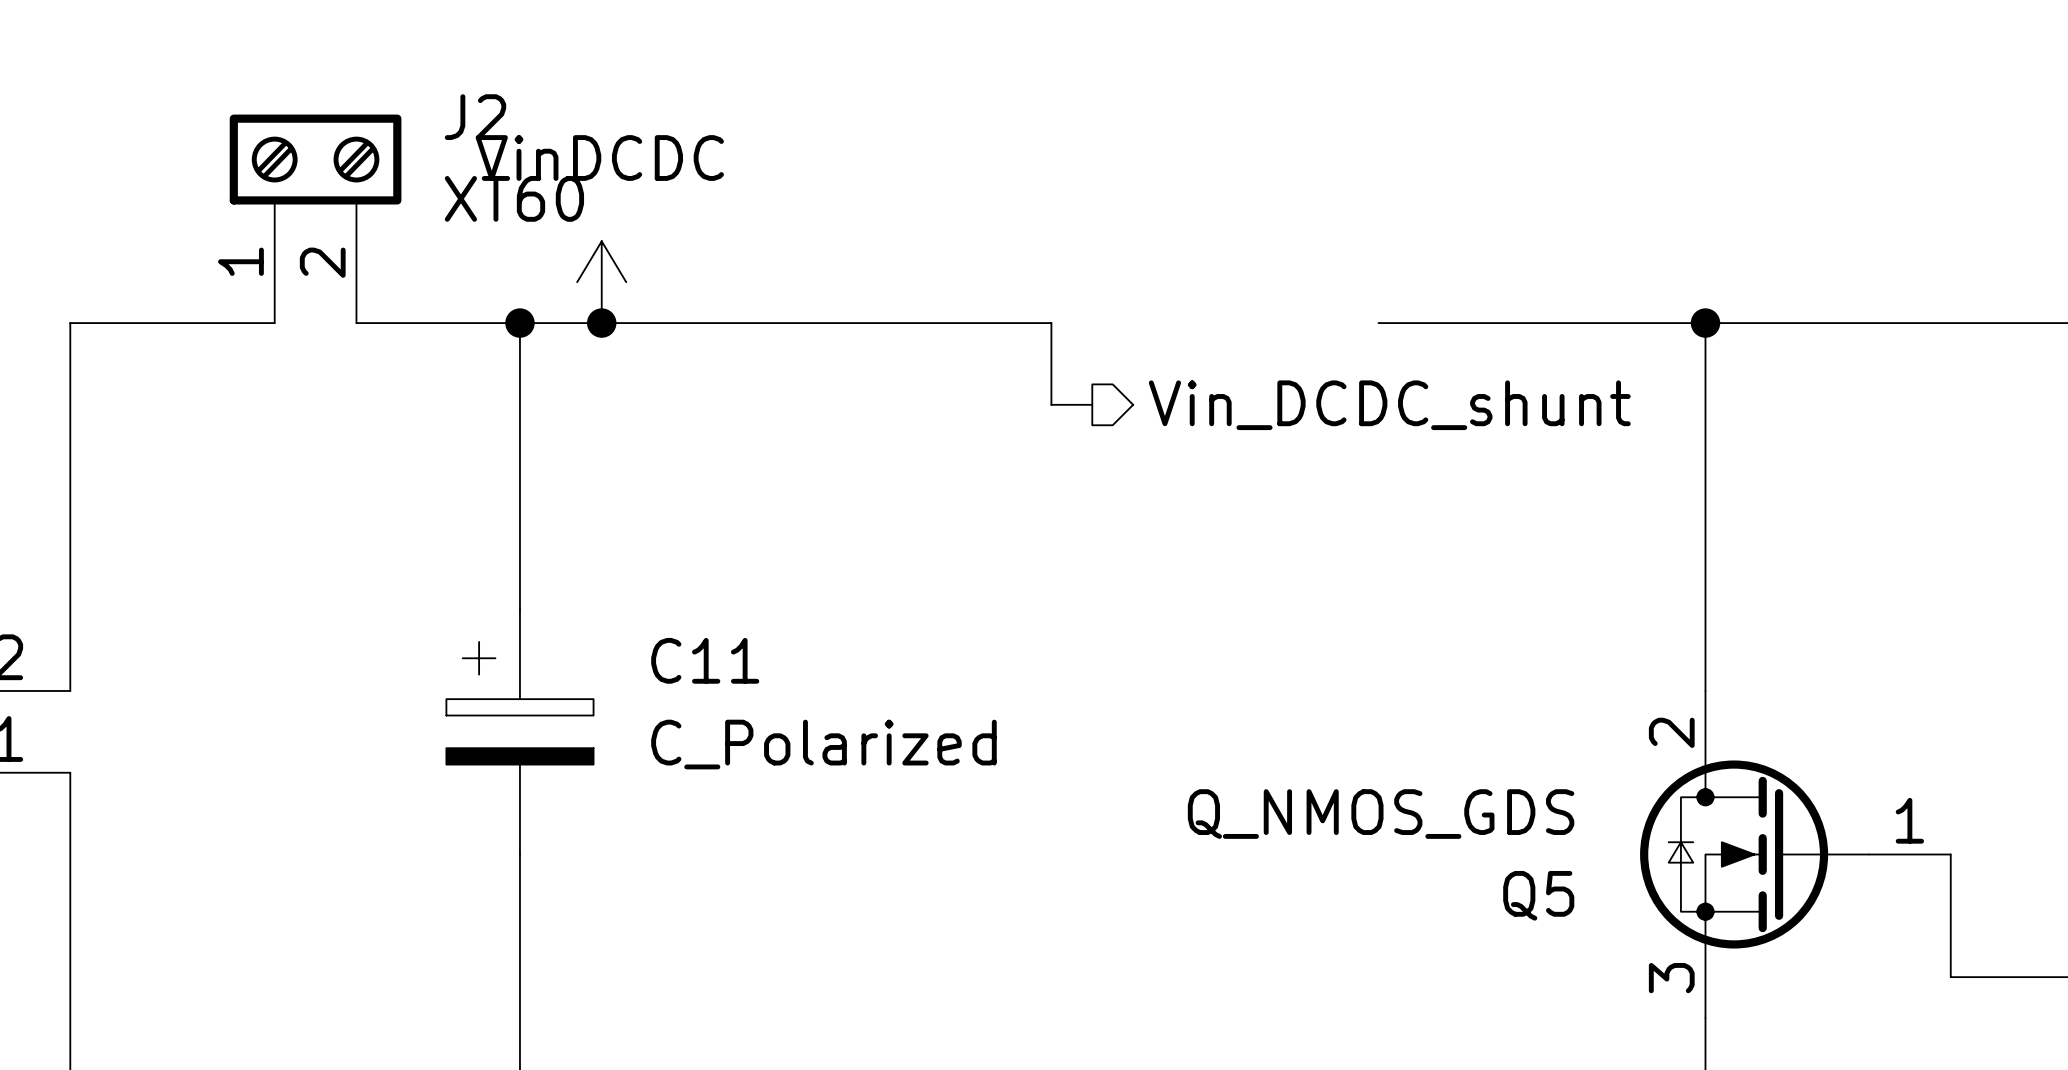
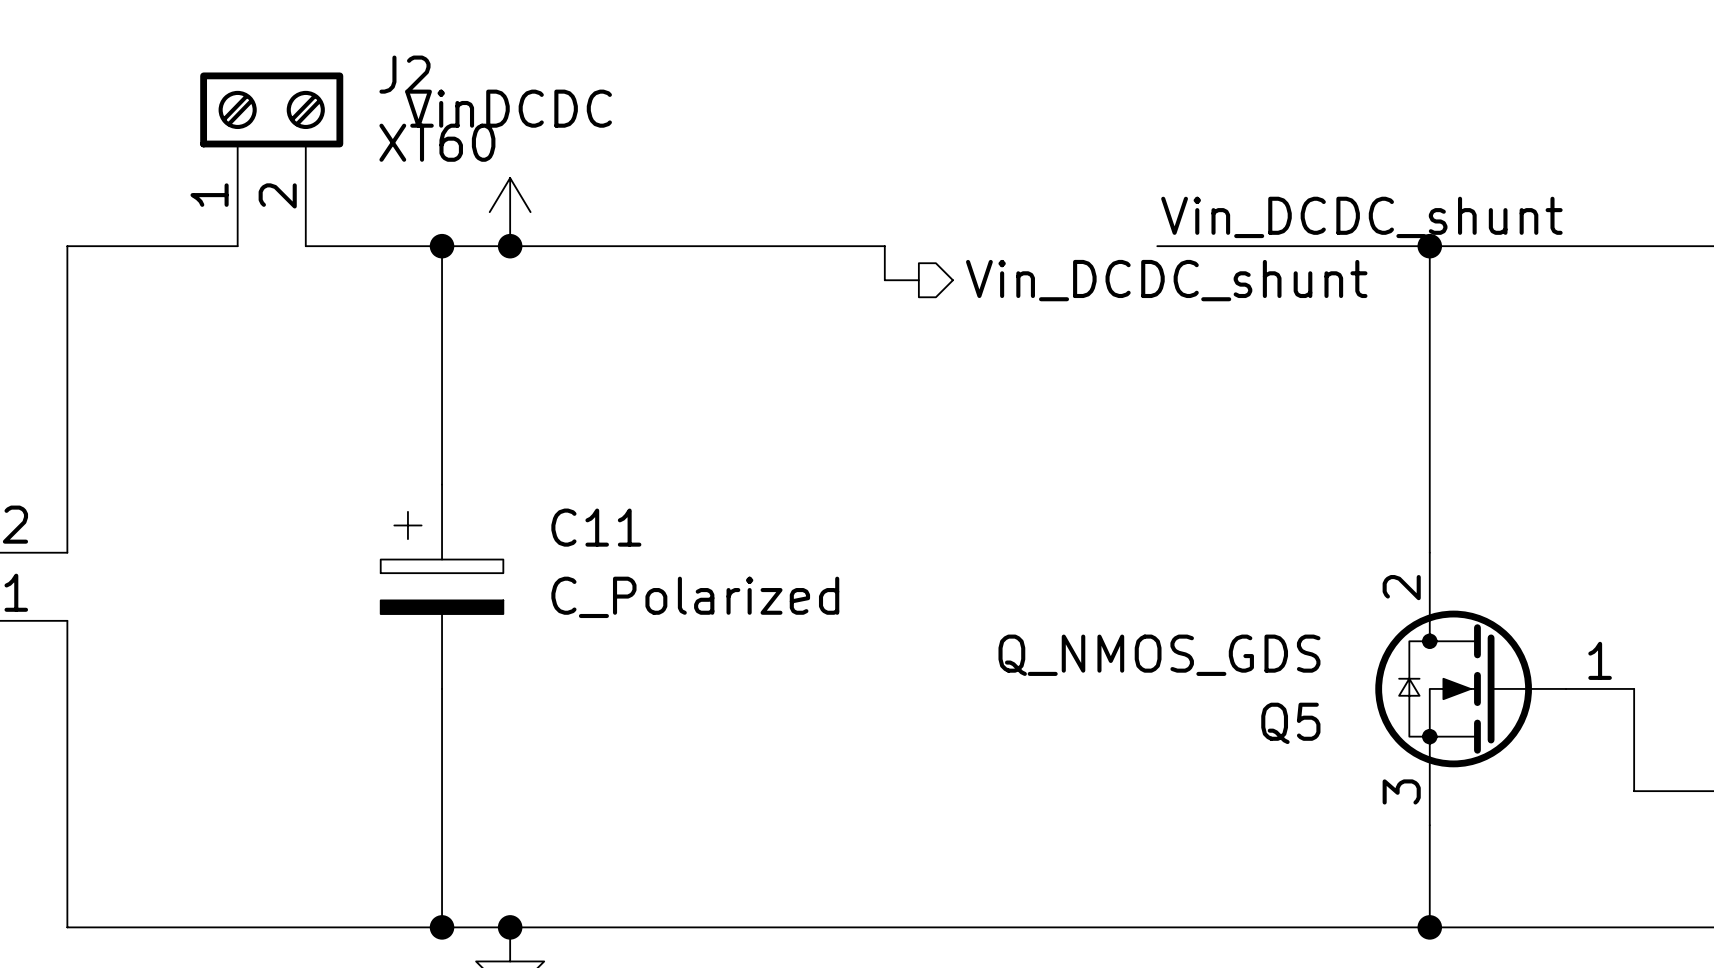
label: none -> Vin_DCDC_shunt (1361, 217)
wire: (1051, 363) (1051, 404) (1092, 404) -> (884, 280) (918, 280)
hierarchical label position: Vin_DCDC_shunt (1389, 405) -> Vin_DCDC_shunt (1166, 280)

